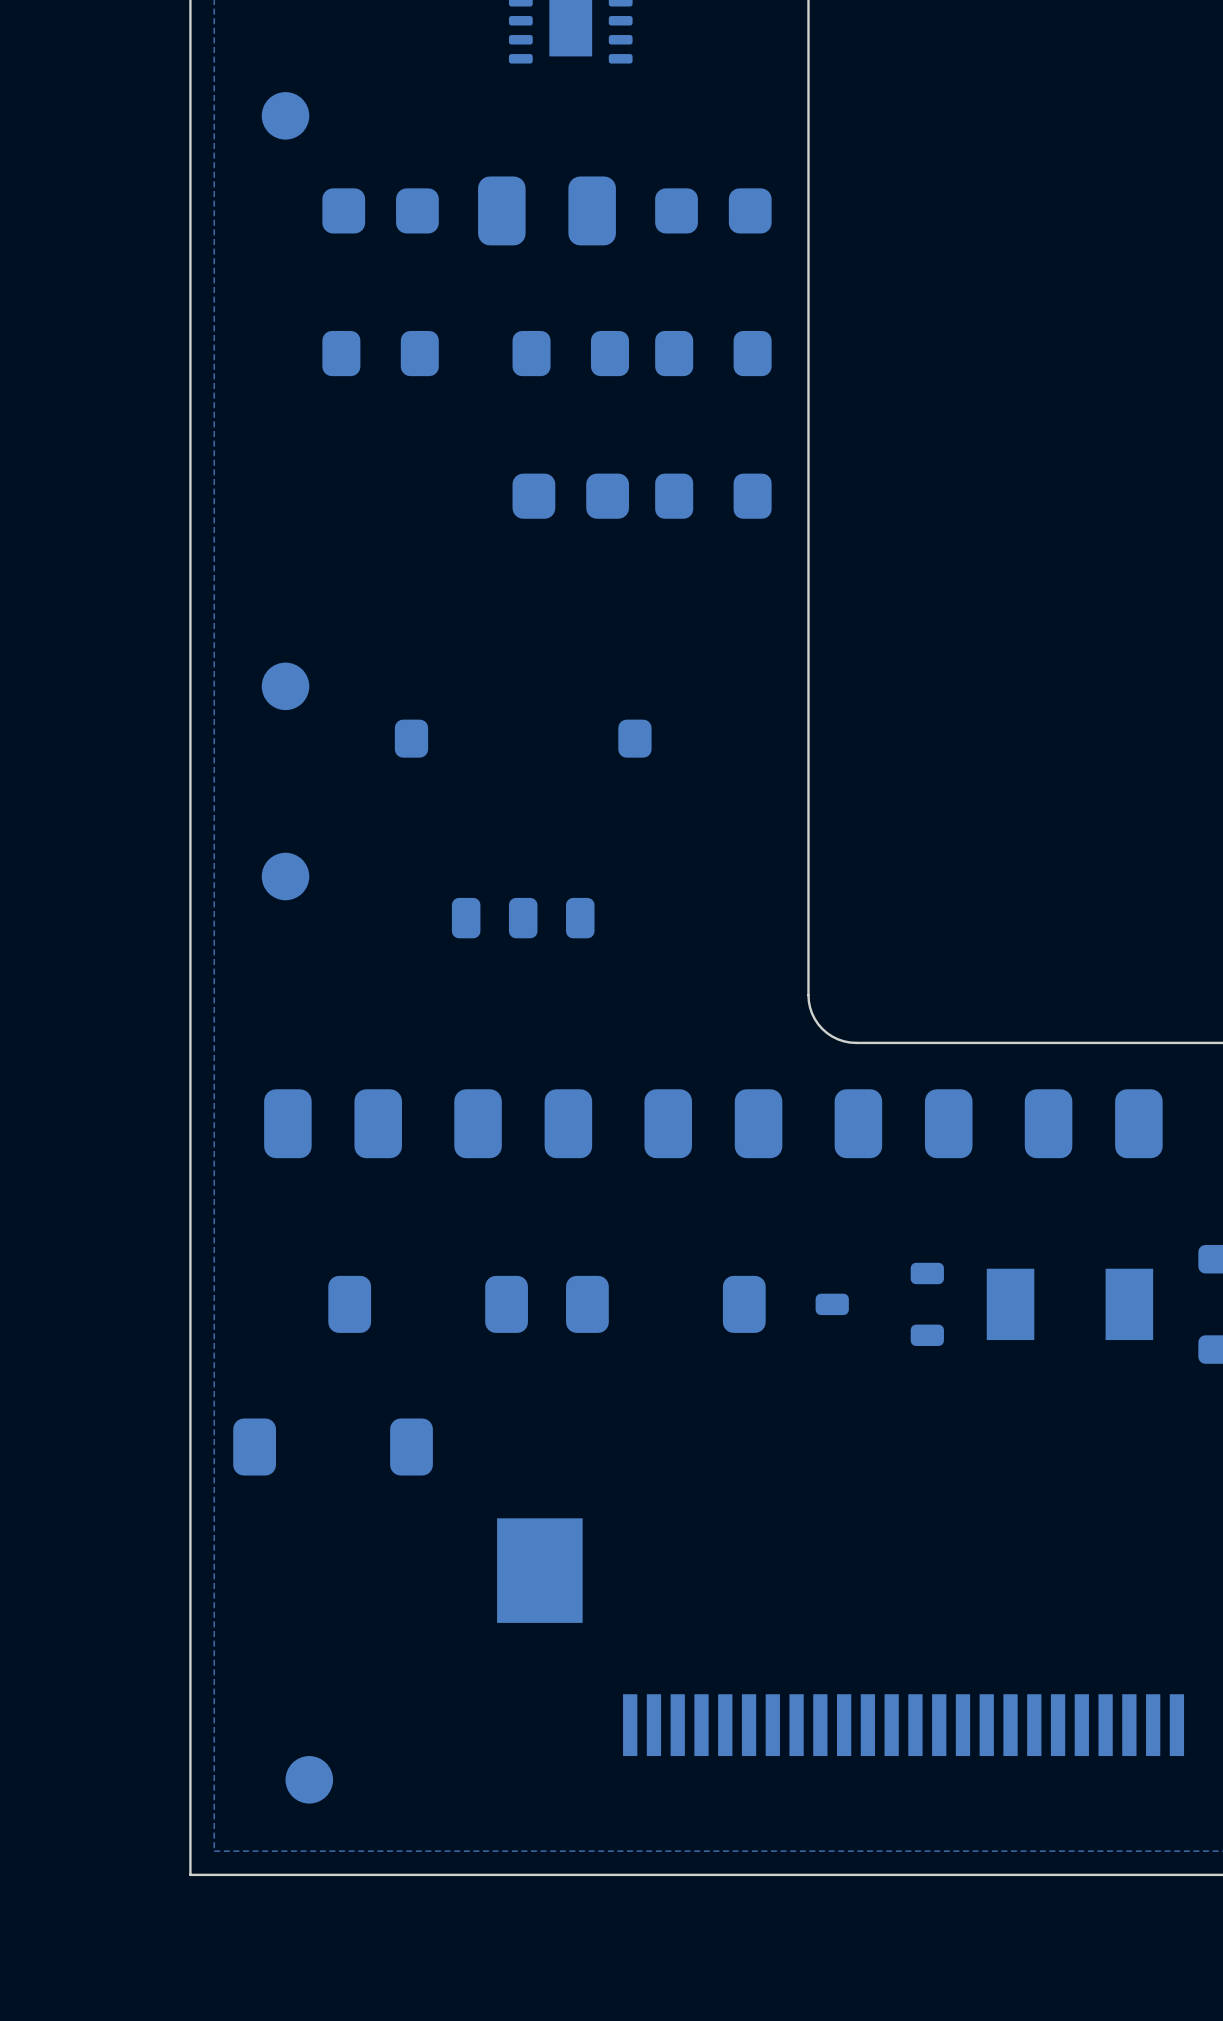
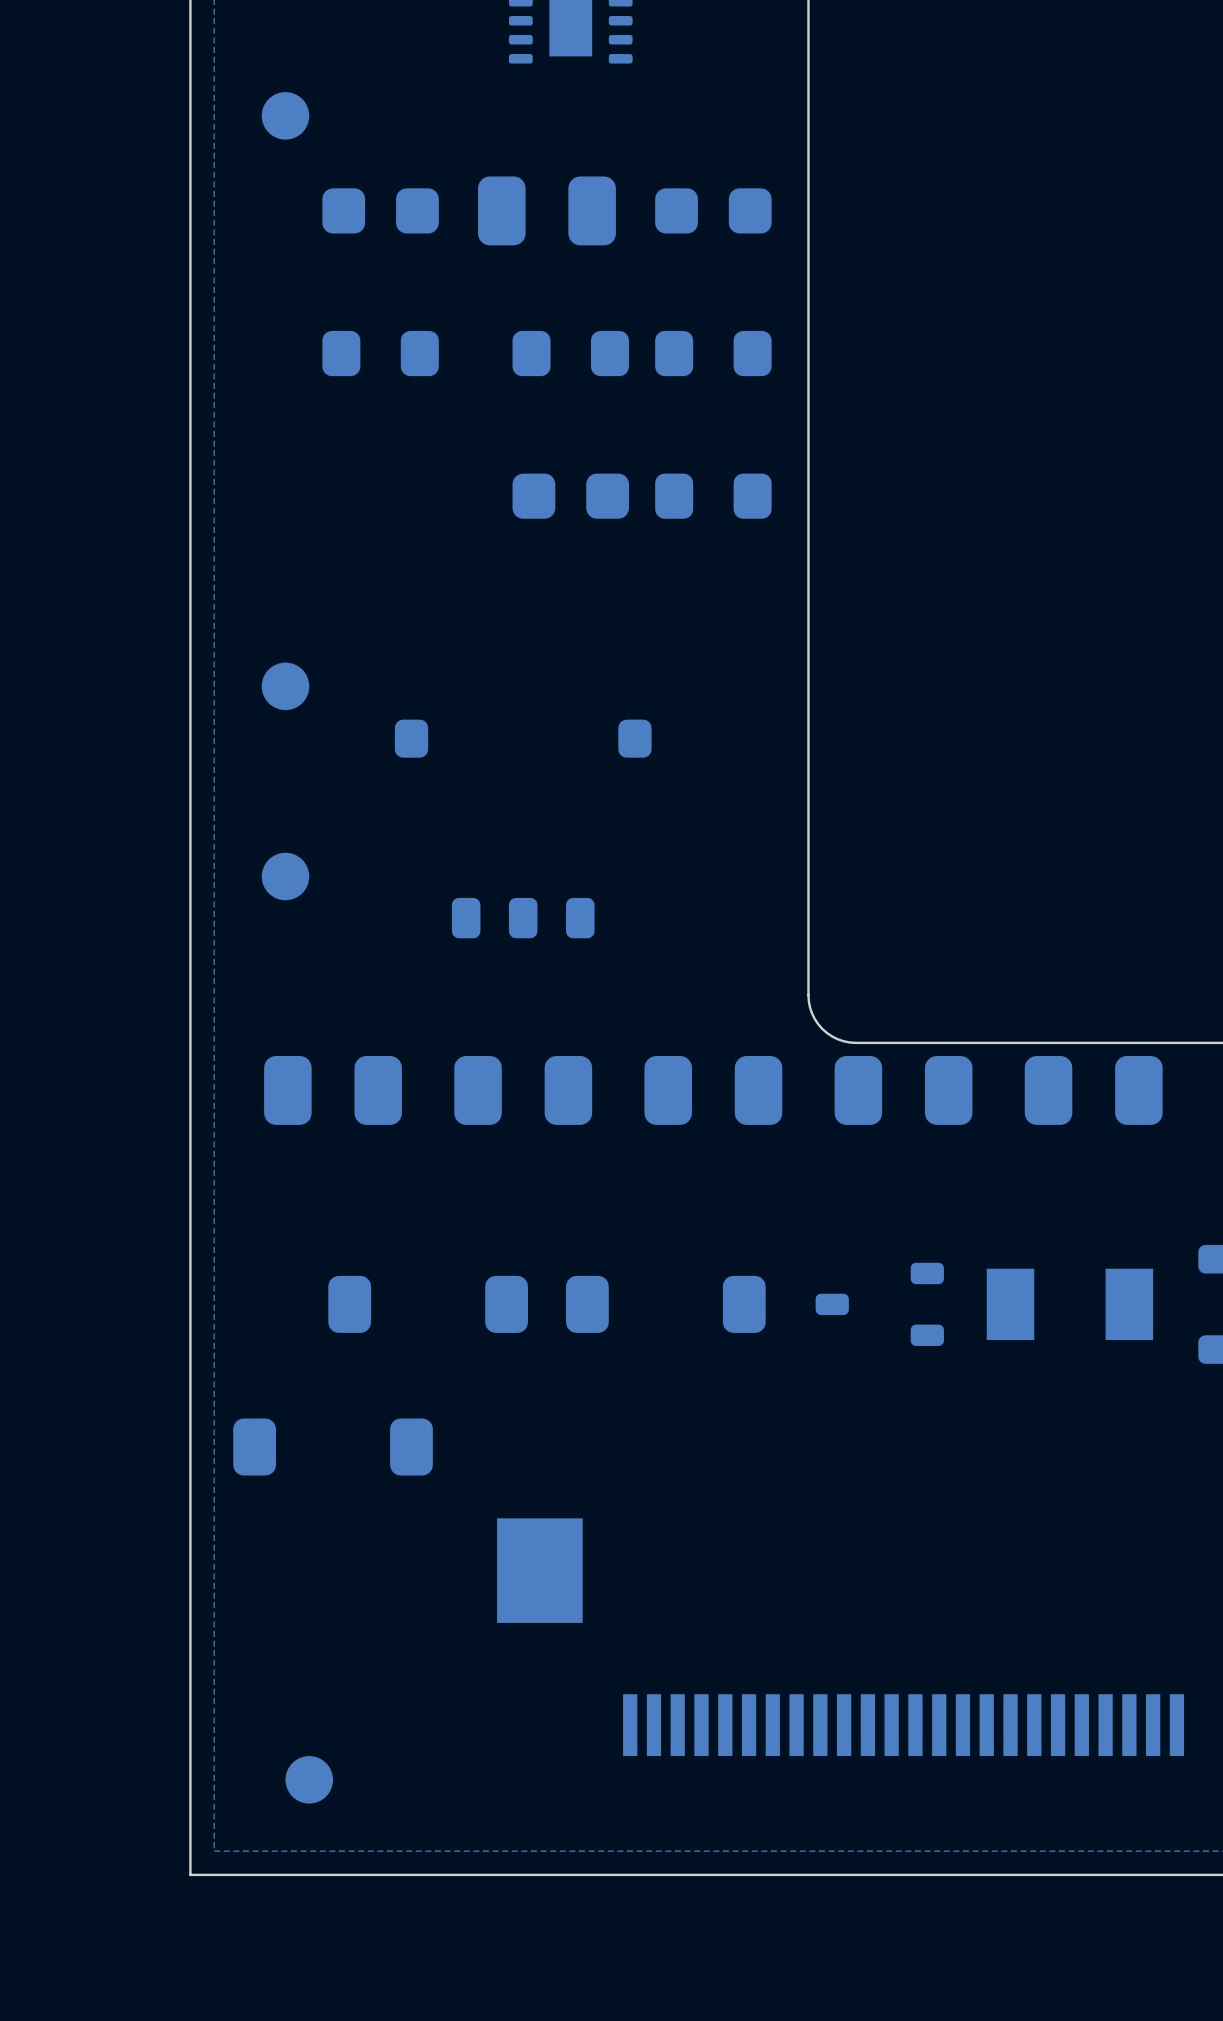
part position: (333, 1123) -> (333, 1090)
part position: (523, 1123) -> (523, 1090)
part position: (713, 1123) -> (713, 1090)
part position: (903, 1123) -> (903, 1090)
part position: (1093, 1123) -> (1093, 1090)

